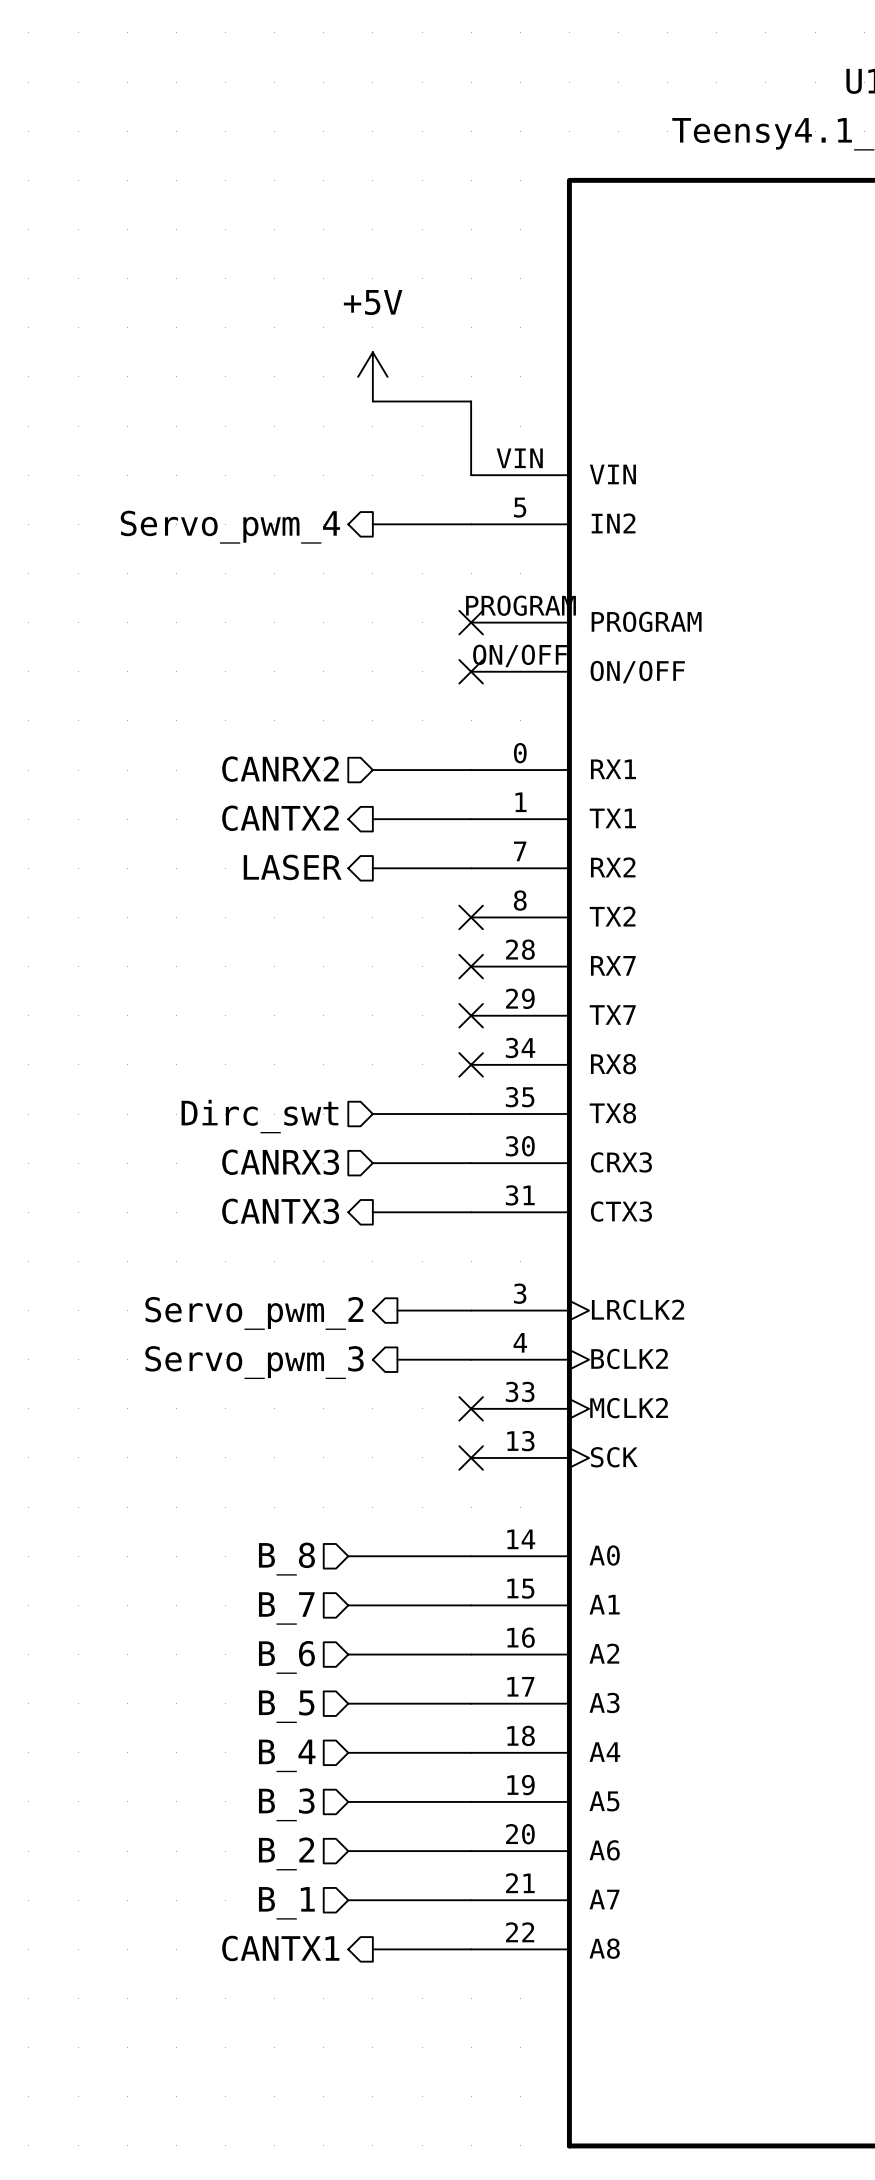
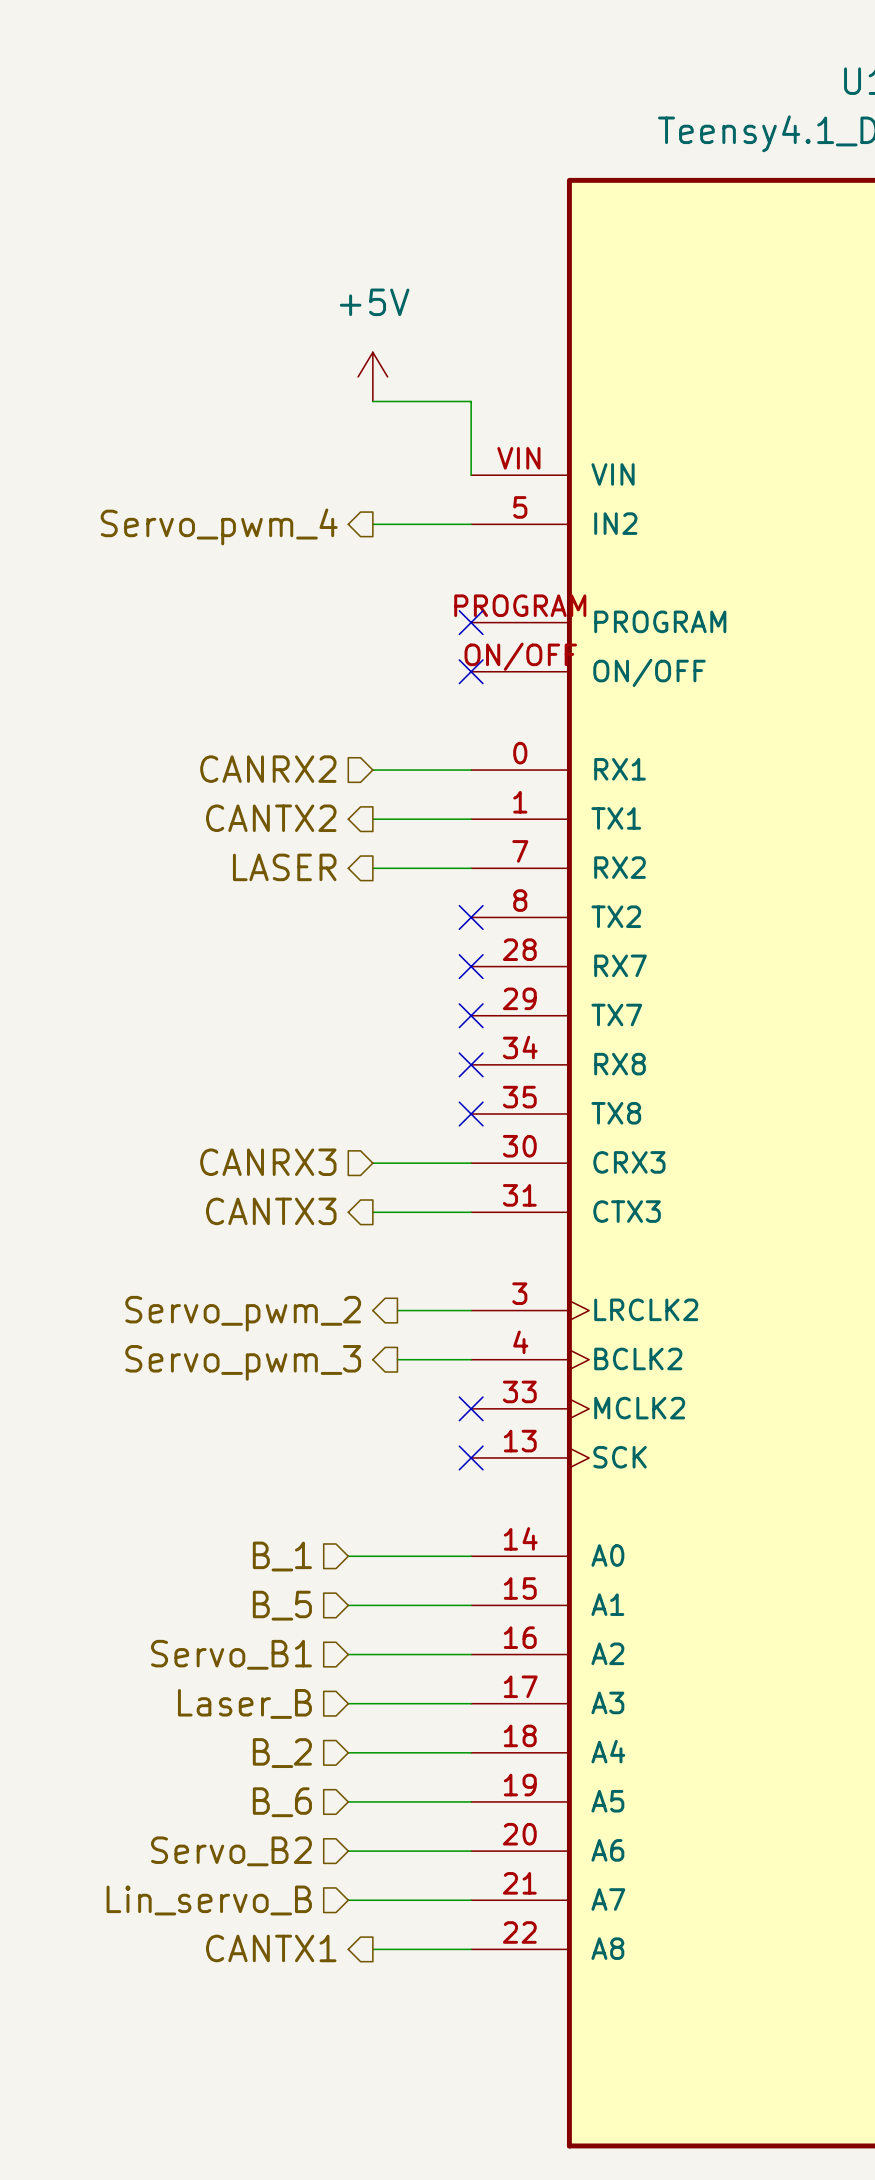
wire: (372, 1114) (471, 1114) -> none
no-connect mark: none -> (471, 1114)
hierarchical label: Dirc_swt (259, 1116) -> none
hierarchical label: B_8 (286, 1559) -> B_1 (282, 1556)
hierarchical label: B_7 (286, 1608) -> B_5 (282, 1605)
hierarchical label: B_6 (286, 1657) -> Servo_B1 (231, 1654)
hierarchical label: B_5 (286, 1706) -> Laser_B (244, 1703)
hierarchical label: B_4 (287, 1755) -> B_2 (282, 1753)
hierarchical label: B_3 (286, 1804) -> B_6 (282, 1802)
hierarchical label: B_2 (286, 1853) -> Servo_B2 (231, 1851)
hierarchical label: B_1 (286, 1903) -> Lin_servo_B (209, 1900)

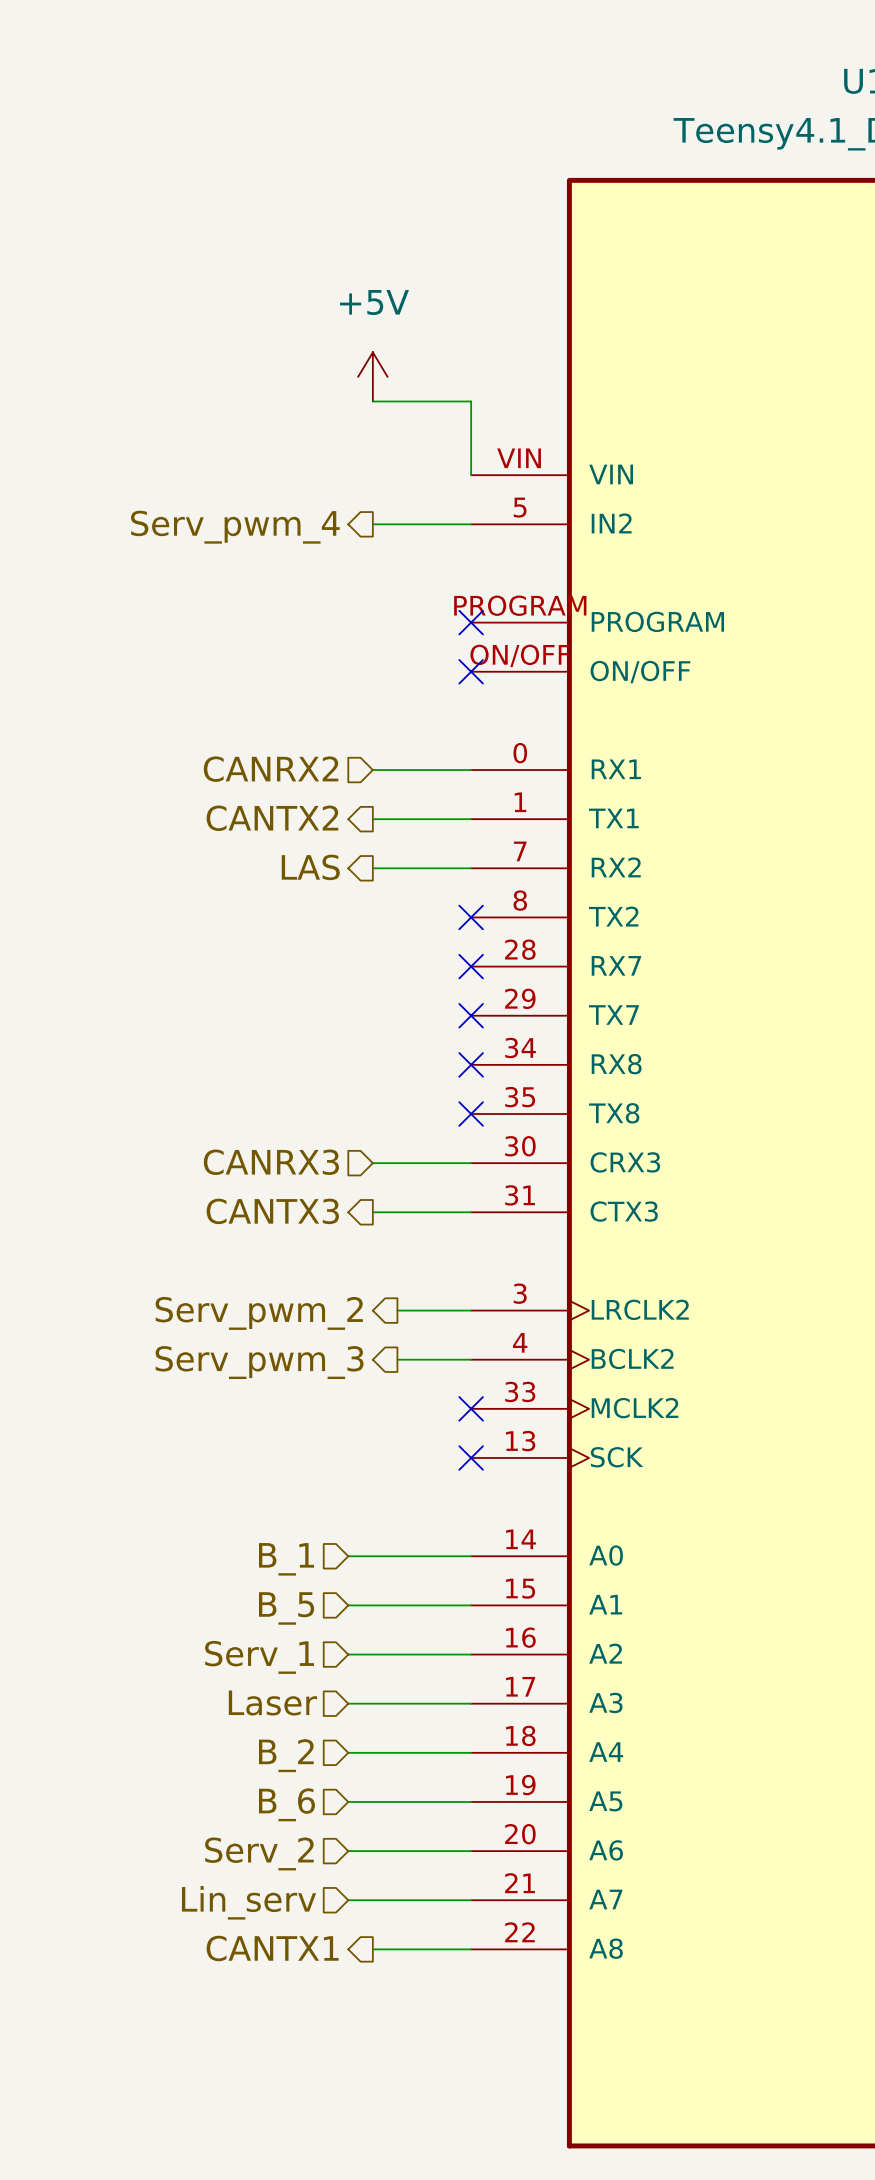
hierarchical label: Servo_pwm_4 (219, 526) -> Serv_pwm_4 (235, 527)
hierarchical label: LASER (284, 867) -> LAS (310, 867)
hierarchical label: Servo_pwm_2 (243, 1313) -> Serv_pwm_2 (259, 1313)
hierarchical label: Servo_pwm_3 (243, 1362) -> Serv_pwm_3 (259, 1362)
hierarchical label: Servo_B1 (231, 1654) -> Serv_1 (259, 1657)
hierarchical label: Laser_B (244, 1703) -> Laser (272, 1703)
hierarchical label: Servo_B2 (231, 1851) -> Serv_2 (259, 1853)
hierarchical label: Lin_servo_B (209, 1900) -> Lin_serv (249, 1902)

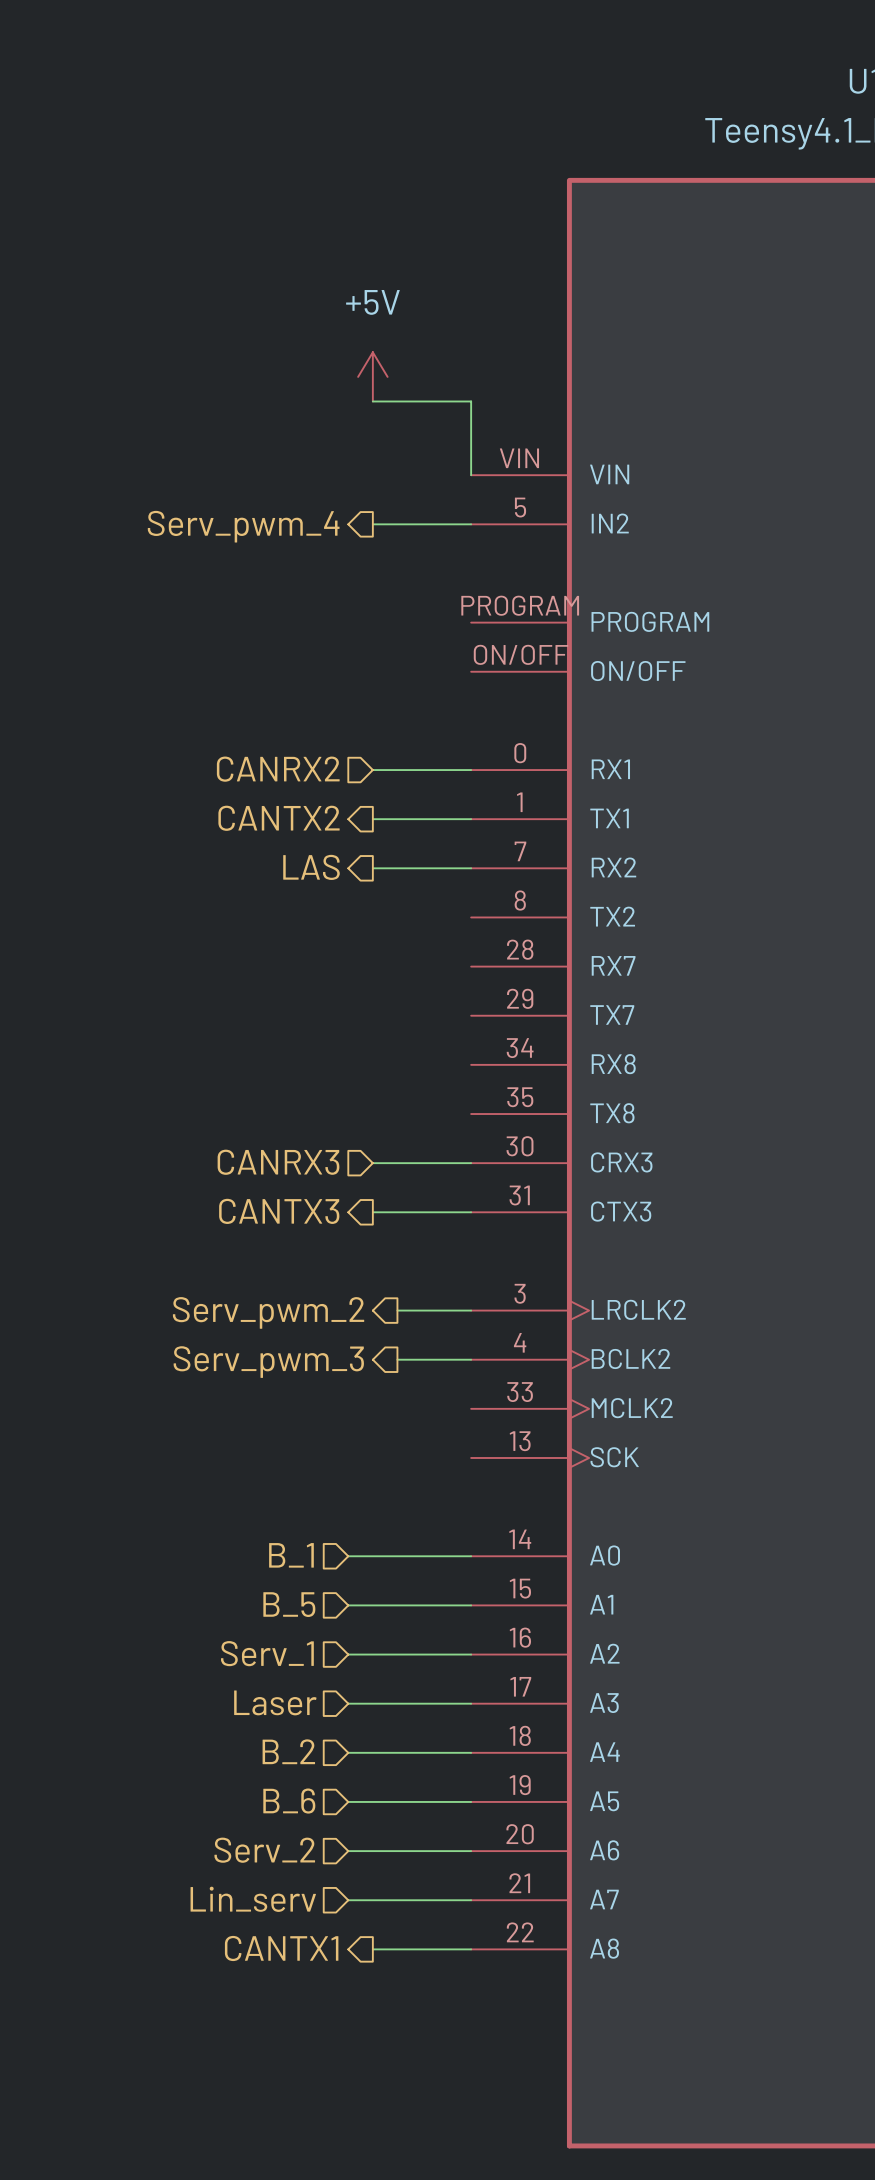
no-connect mark: (471, 622) -> none
no-connect mark: (471, 671) -> none
no-connect mark: (471, 917) -> none
no-connect mark: (471, 966) -> none
no-connect mark: (471, 1015) -> none
no-connect mark: (471, 1064) -> none
no-connect mark: (471, 1114) -> none
no-connect mark: (471, 1408) -> none
no-connect mark: (471, 1457) -> none

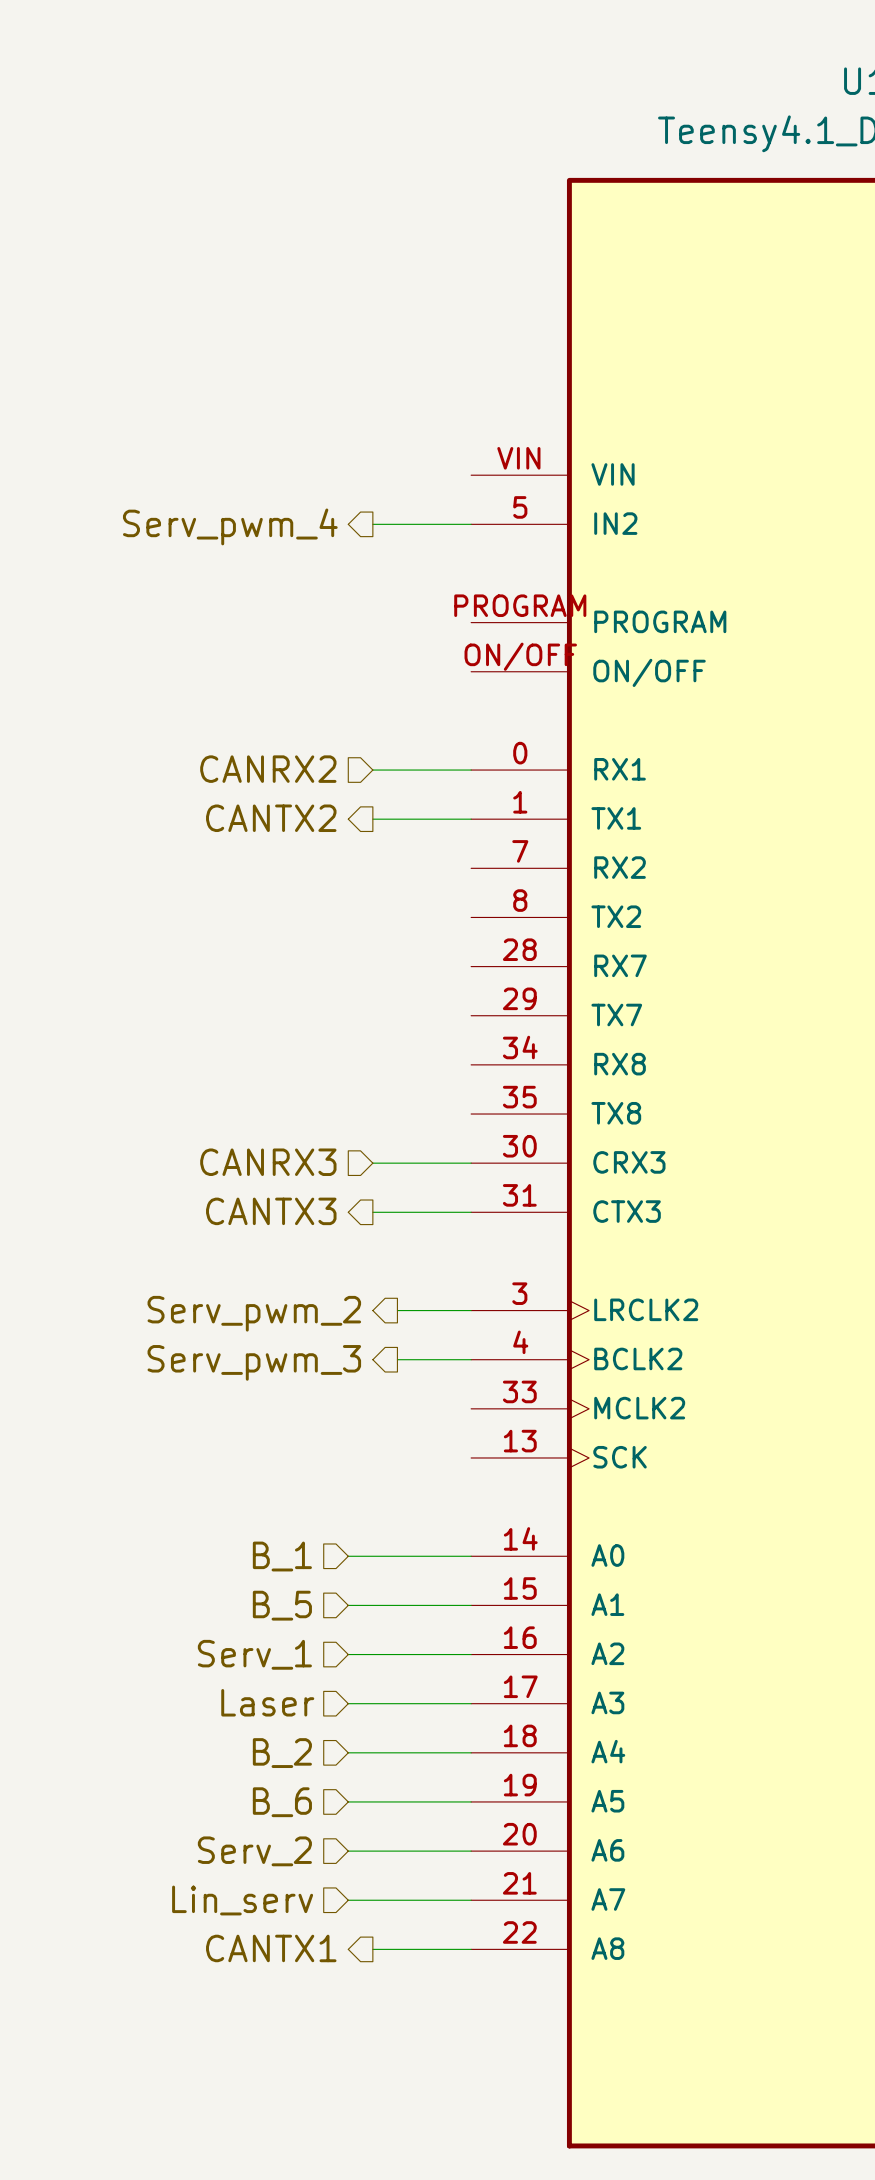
power symbol: +5V (372, 376) -> none
wire: (372, 401) (471, 401) (471, 475) -> none
hierarchical label: LAS (311, 867) -> none
wire: (372, 868) (471, 868) -> none

